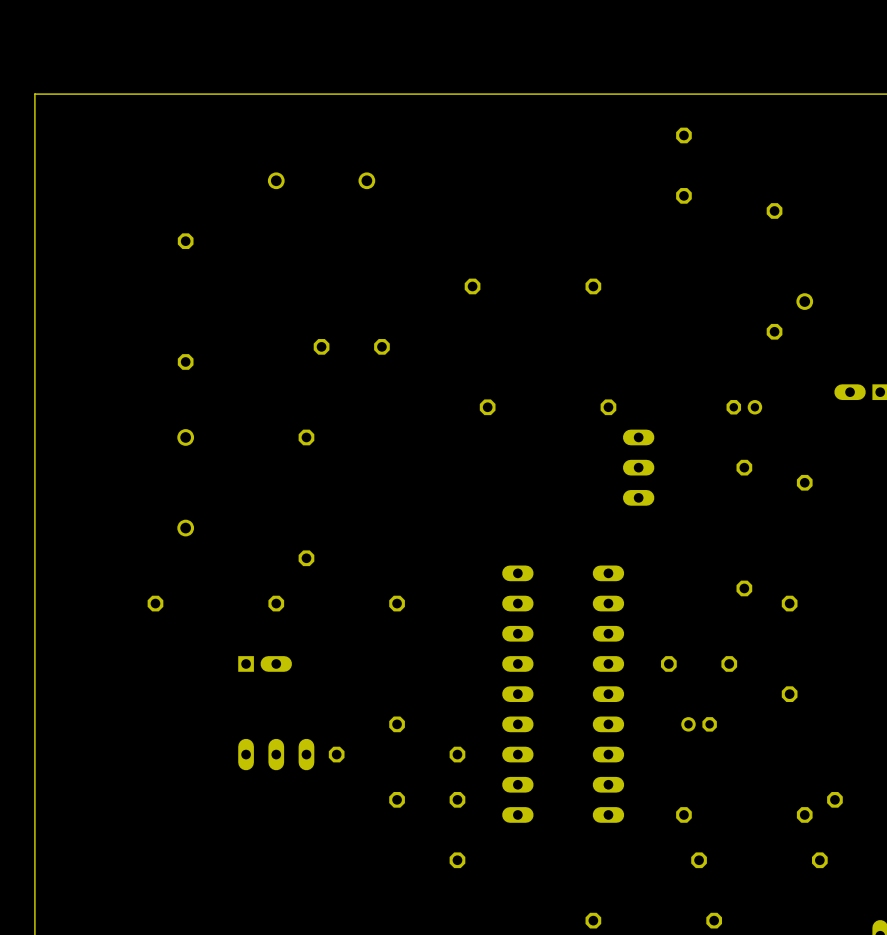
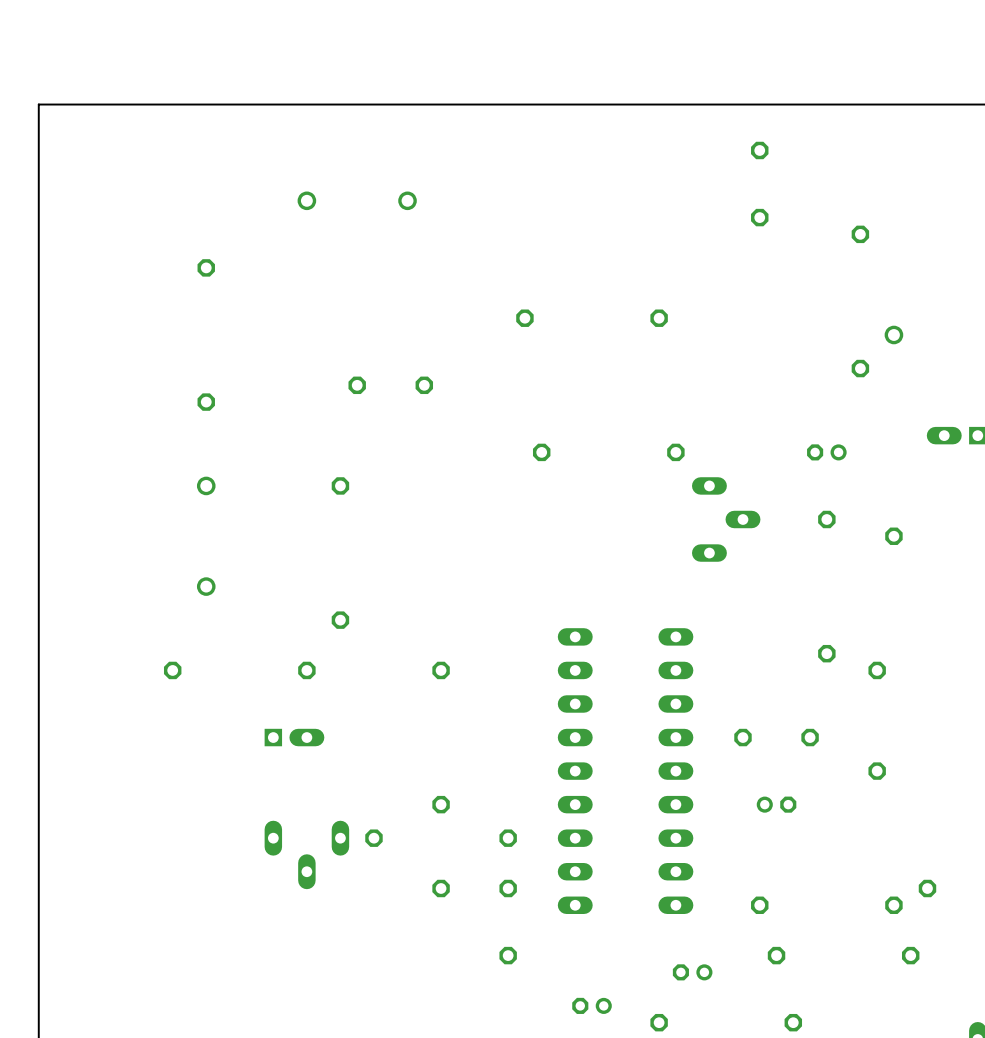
part: (638, 467) -> none
part: none -> (726, 519)
part: (276, 754) -> none
part: none -> (306, 854)
part: none -> (692, 972)
part: none -> (592, 1005)

